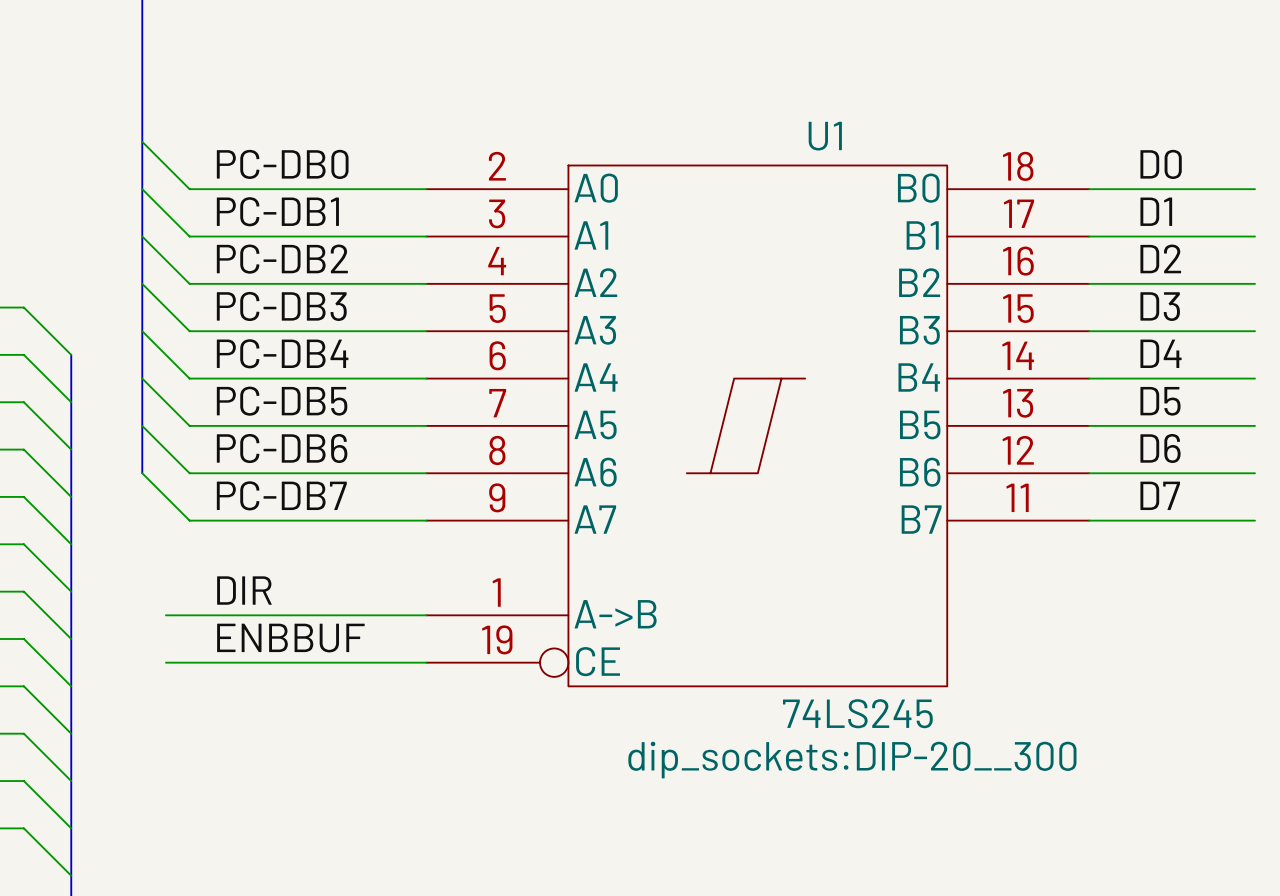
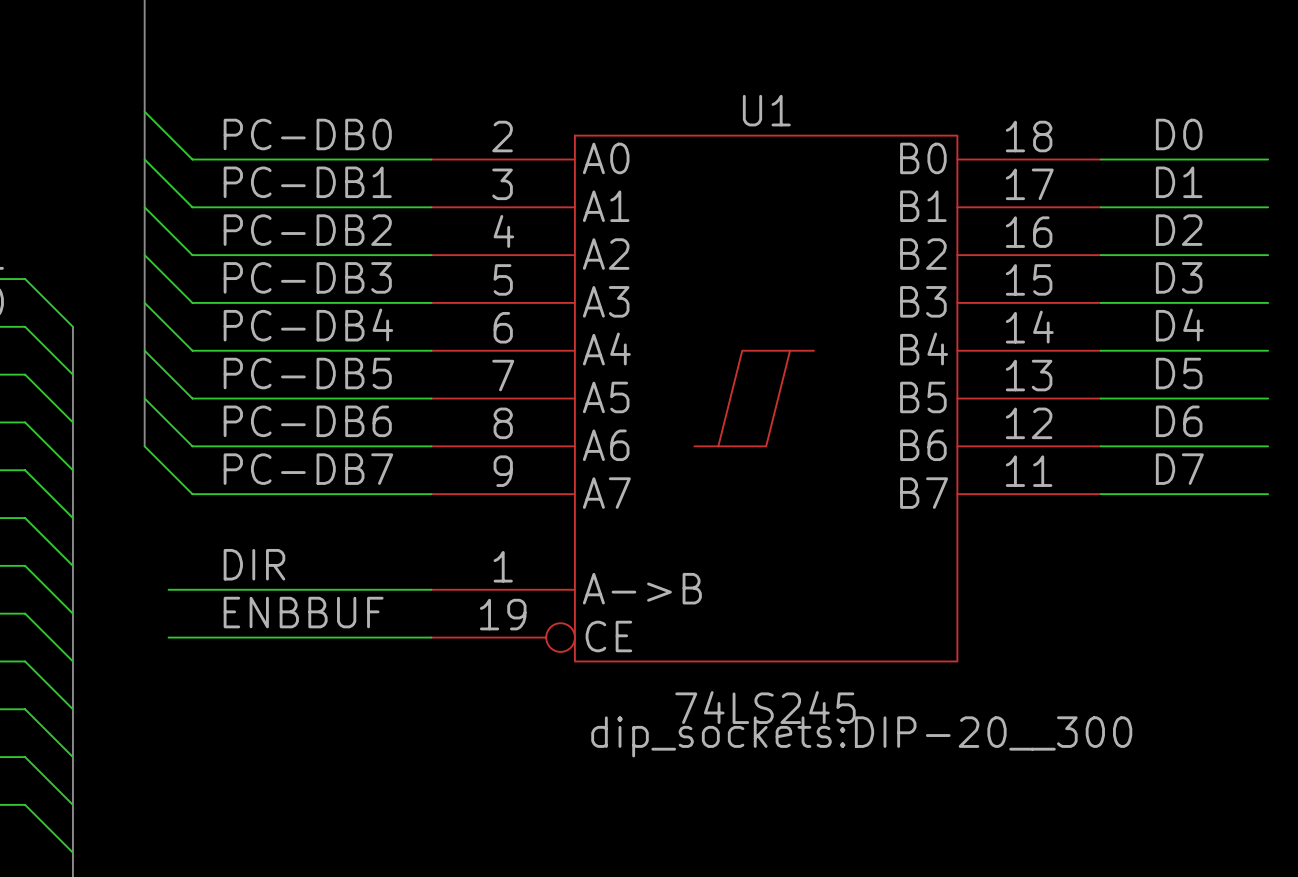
U1 name position: U1 (825, 136) -> U1 (766, 110)
U1 value position: 74LS245 (857, 713) -> 74LS245 (765, 707)

